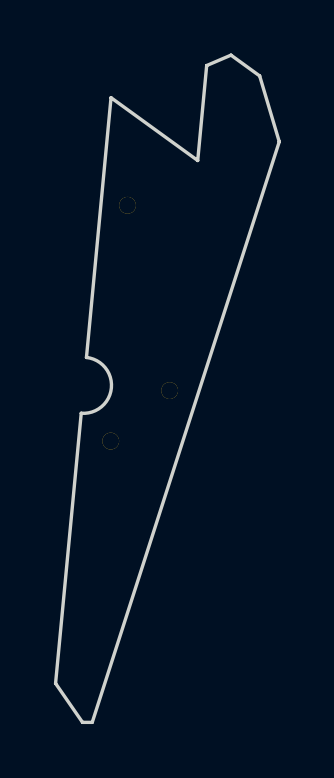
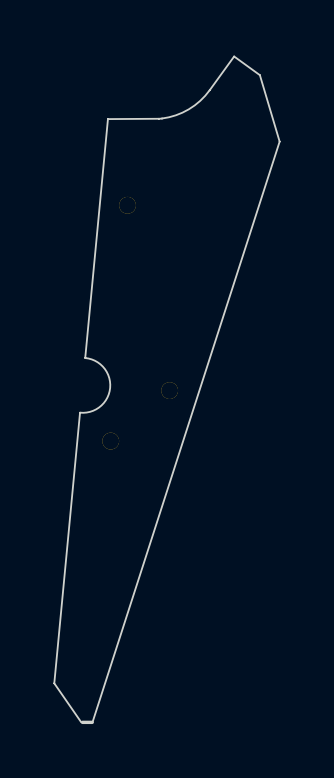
board edge: (92, 722) (279, 141) (259, 75) (230, 55) (206, 65) (197, 160) (111, 97) (86, 357) (96, 360) (105, 367) (110, 377) (111, 387) (108, 398) (101, 406) (92, 412) (81, 413) (55, 683) (82, 722) -> (92, 722) (279, 141) (259, 75) (234, 56) (205, 95) (182, 112) (160, 118) (107, 119) (85, 358) (94, 360) (102, 366) (109, 378) (110, 387) (107, 397) (101, 405) (89, 411) (80, 412) (54, 683) (81, 722)

